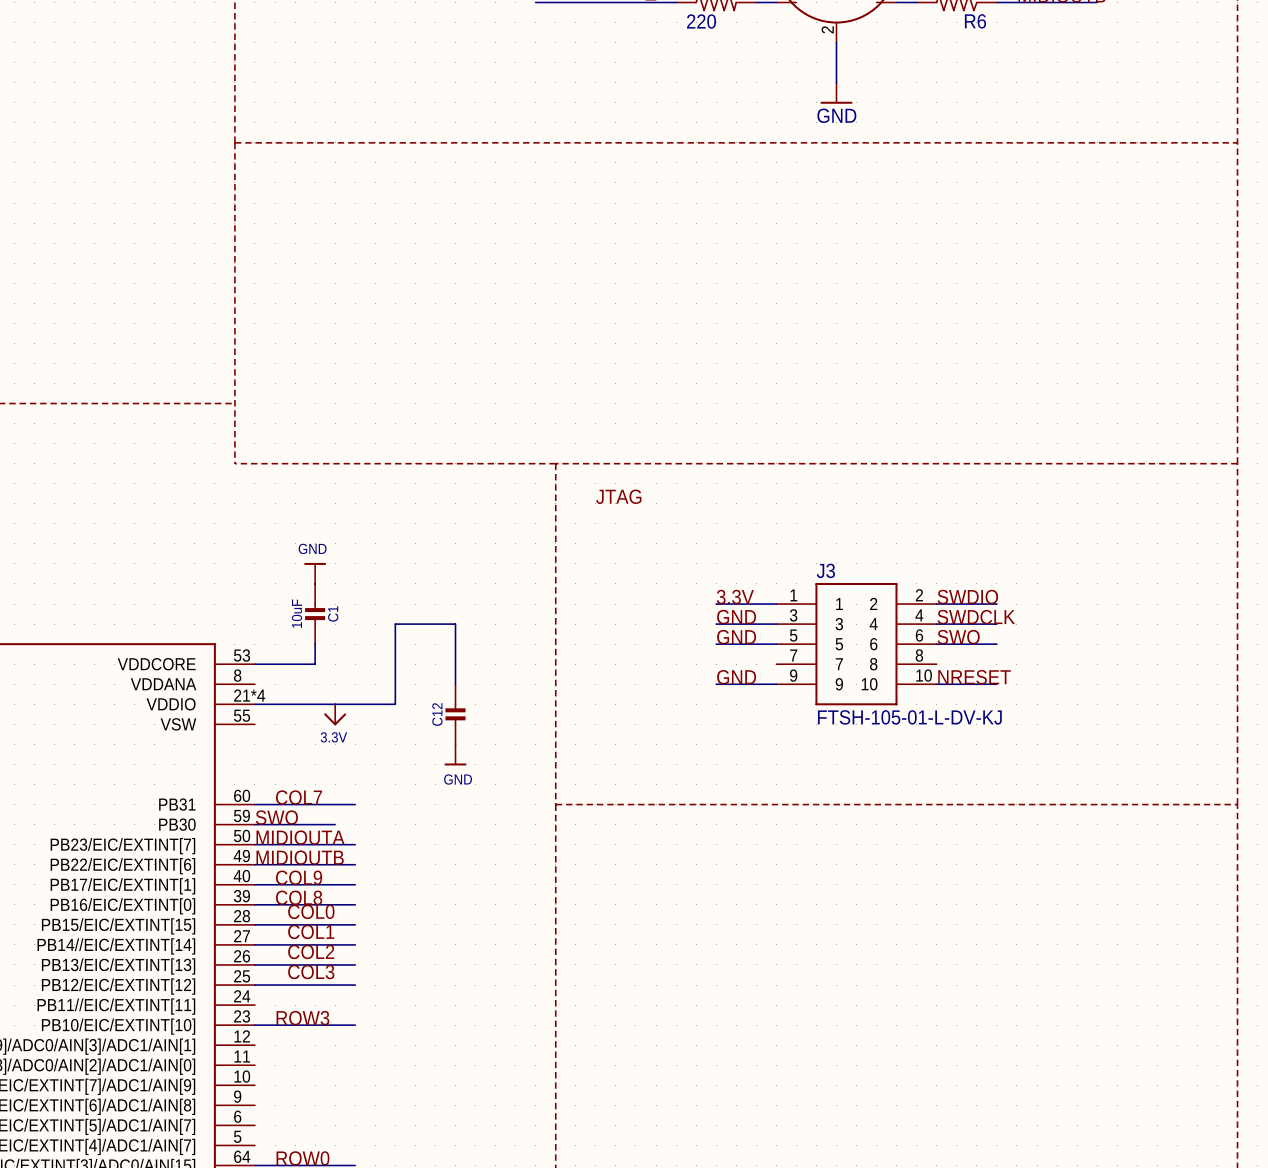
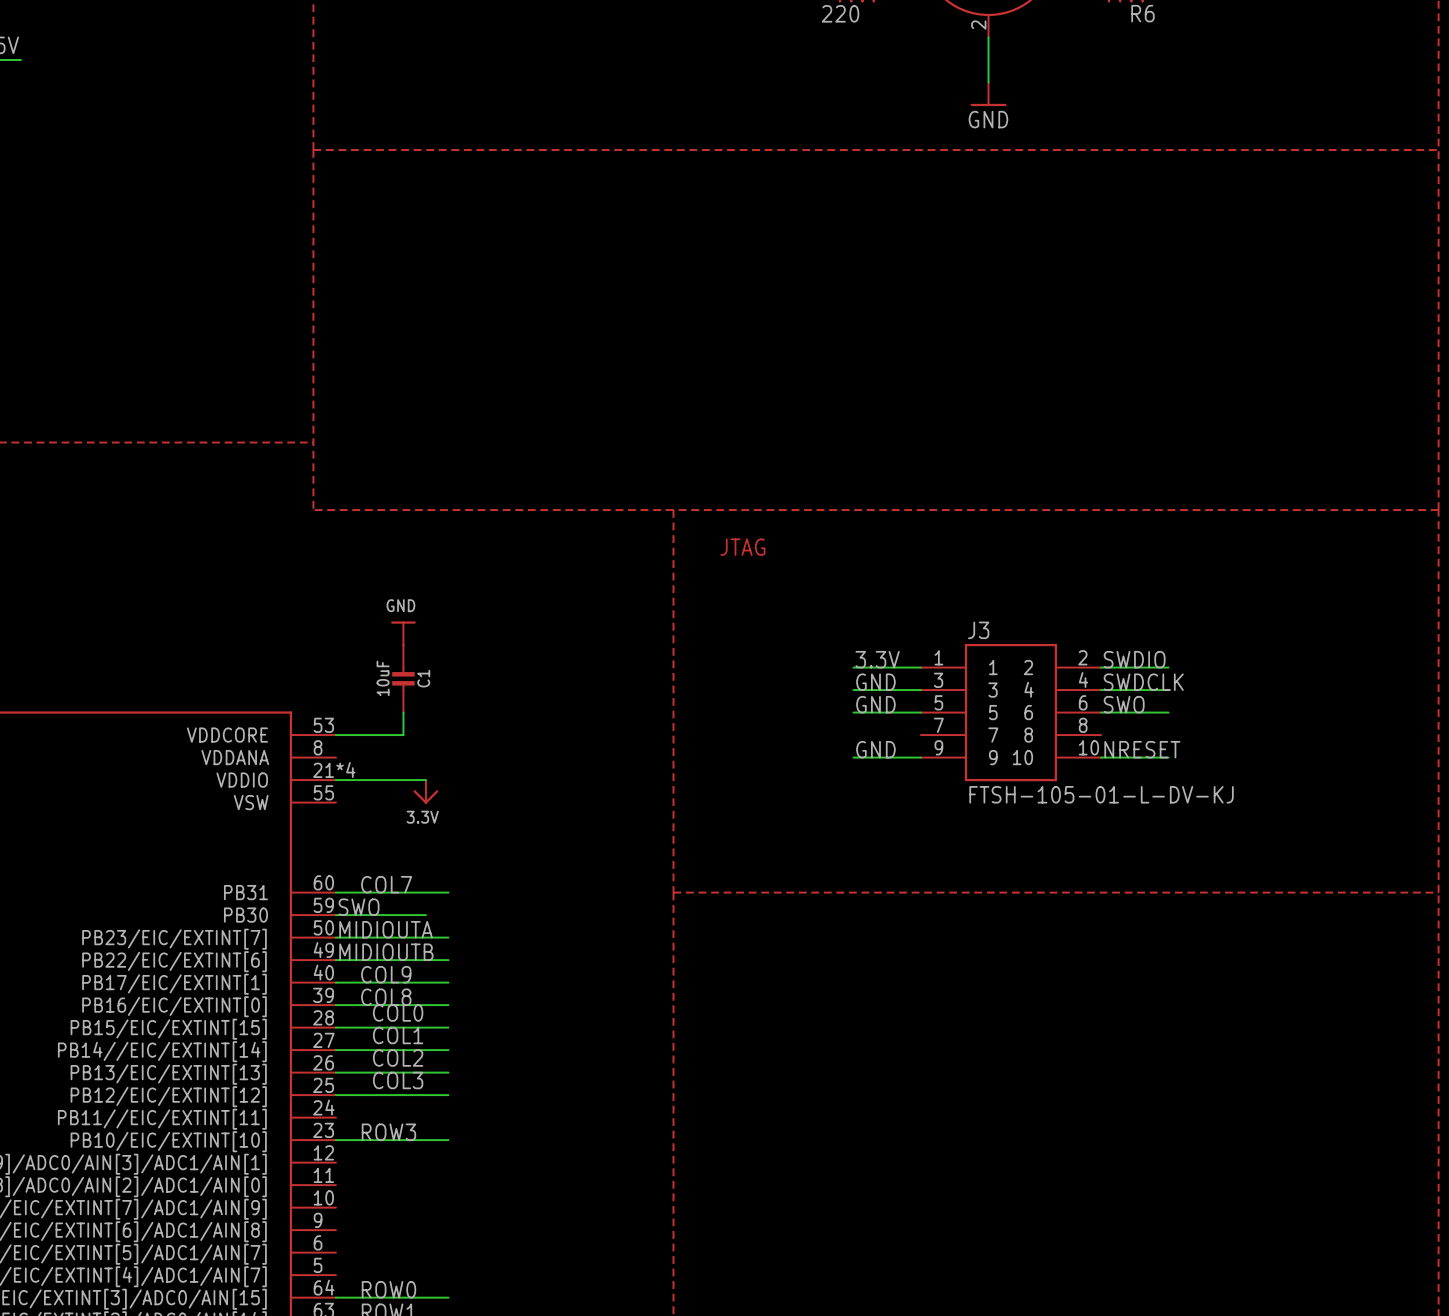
wire: (455, 684) (455, 624) (395, 624) (395, 704) (335, 704) -> none
C12: (455, 714) -> none
power symbol: GND (455, 754) -> none

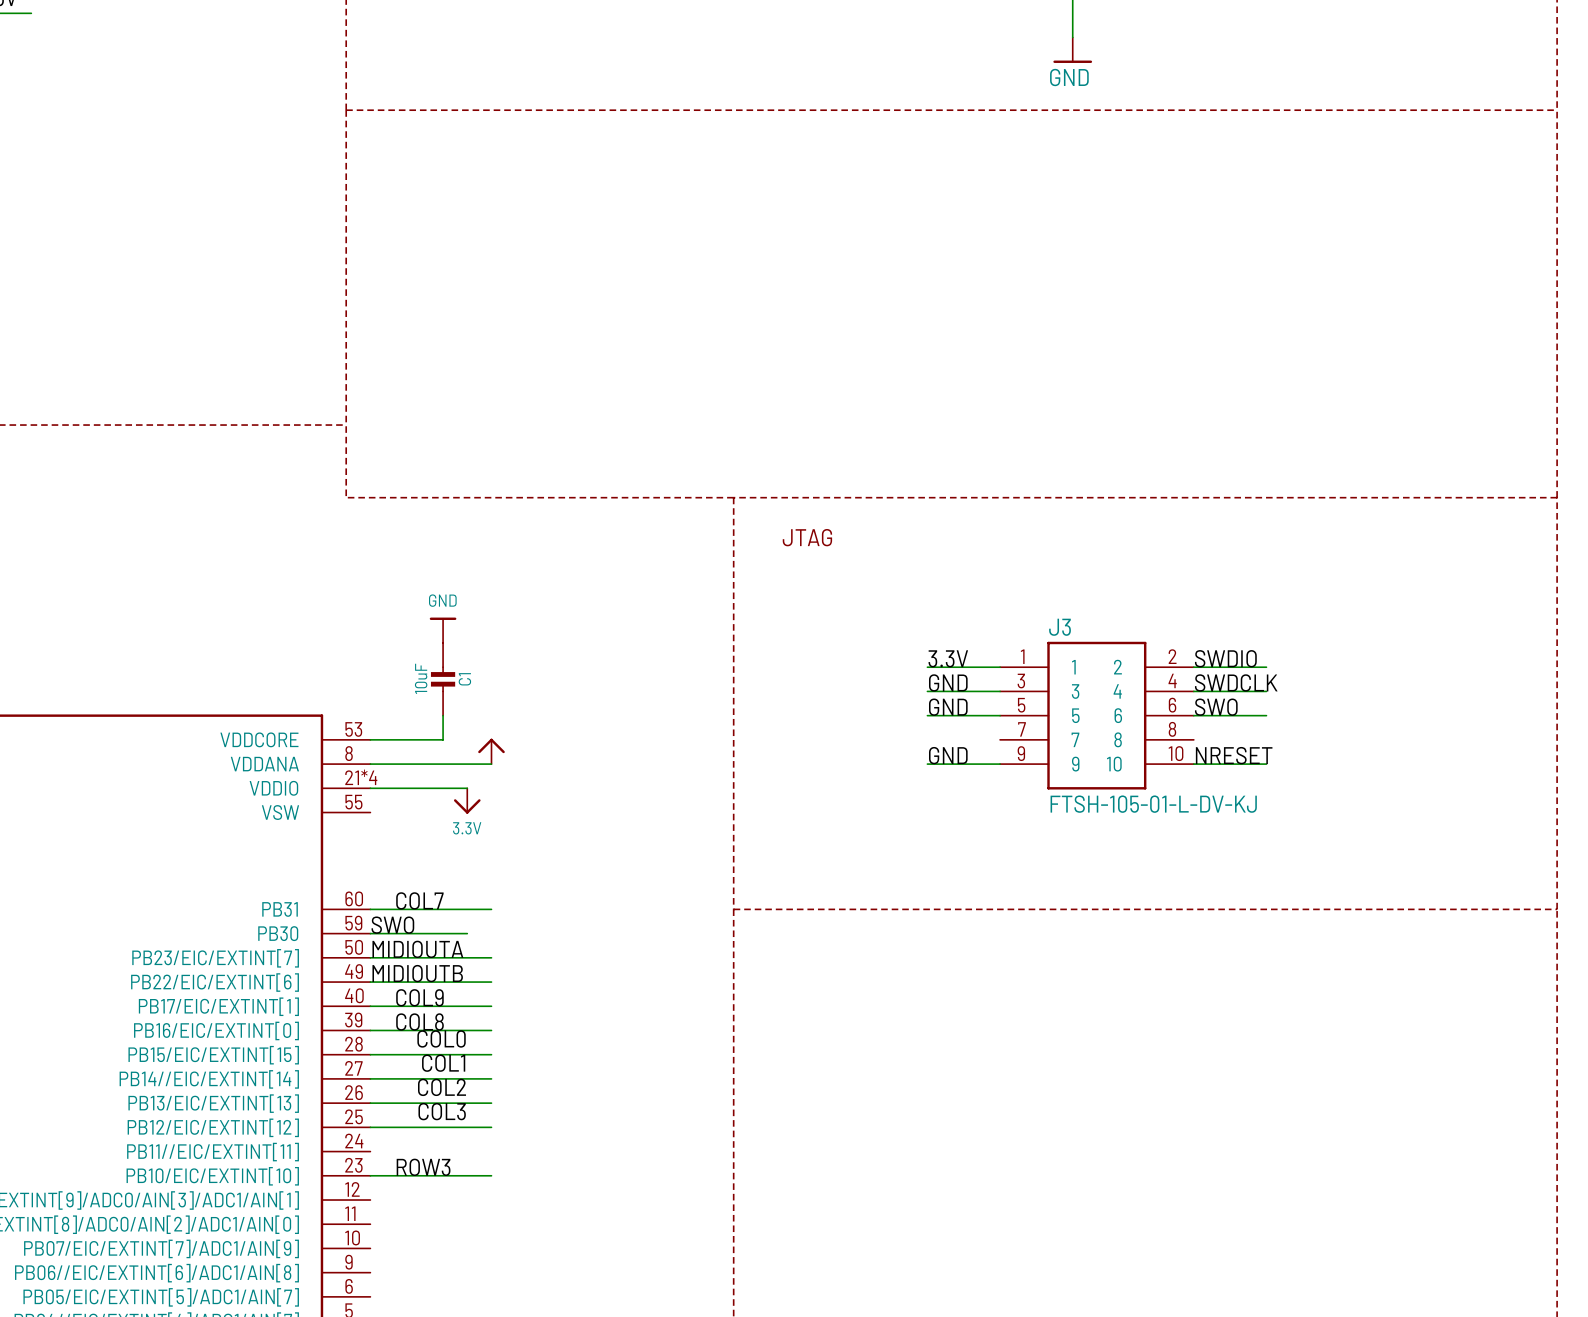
power symbol: none -> (491, 751)
wire: none -> (370, 764) (491, 764)

